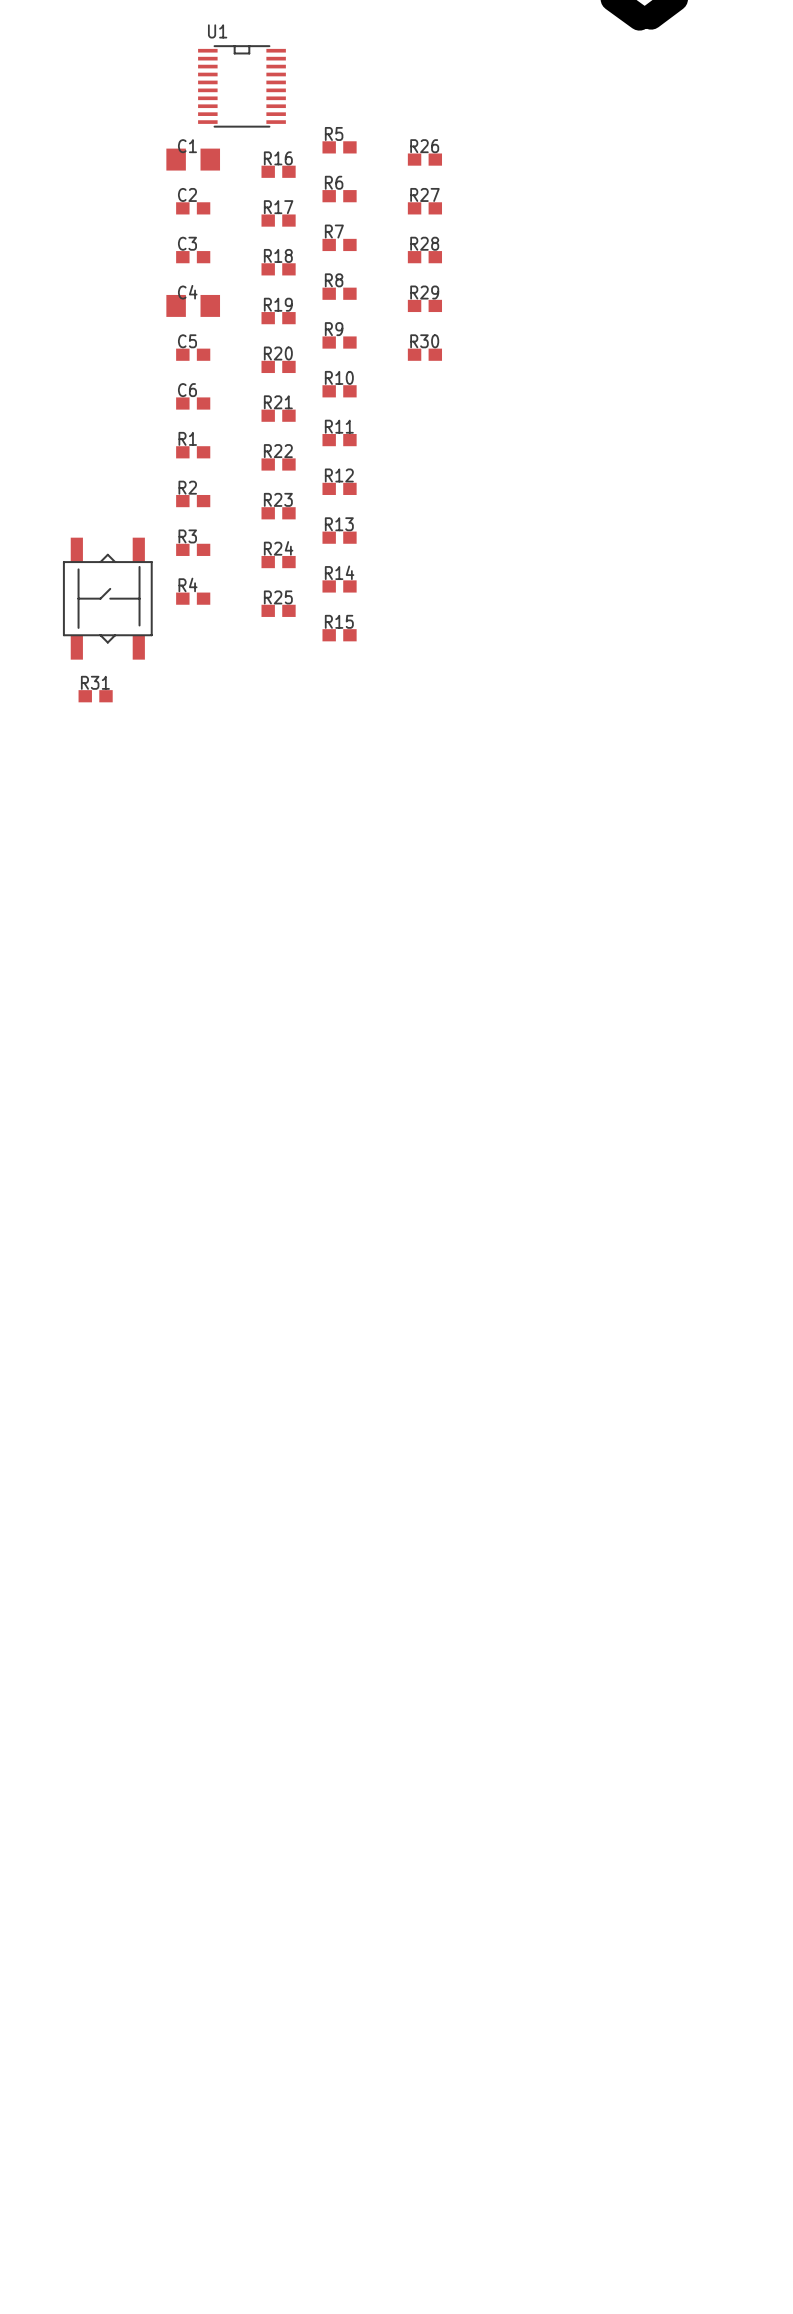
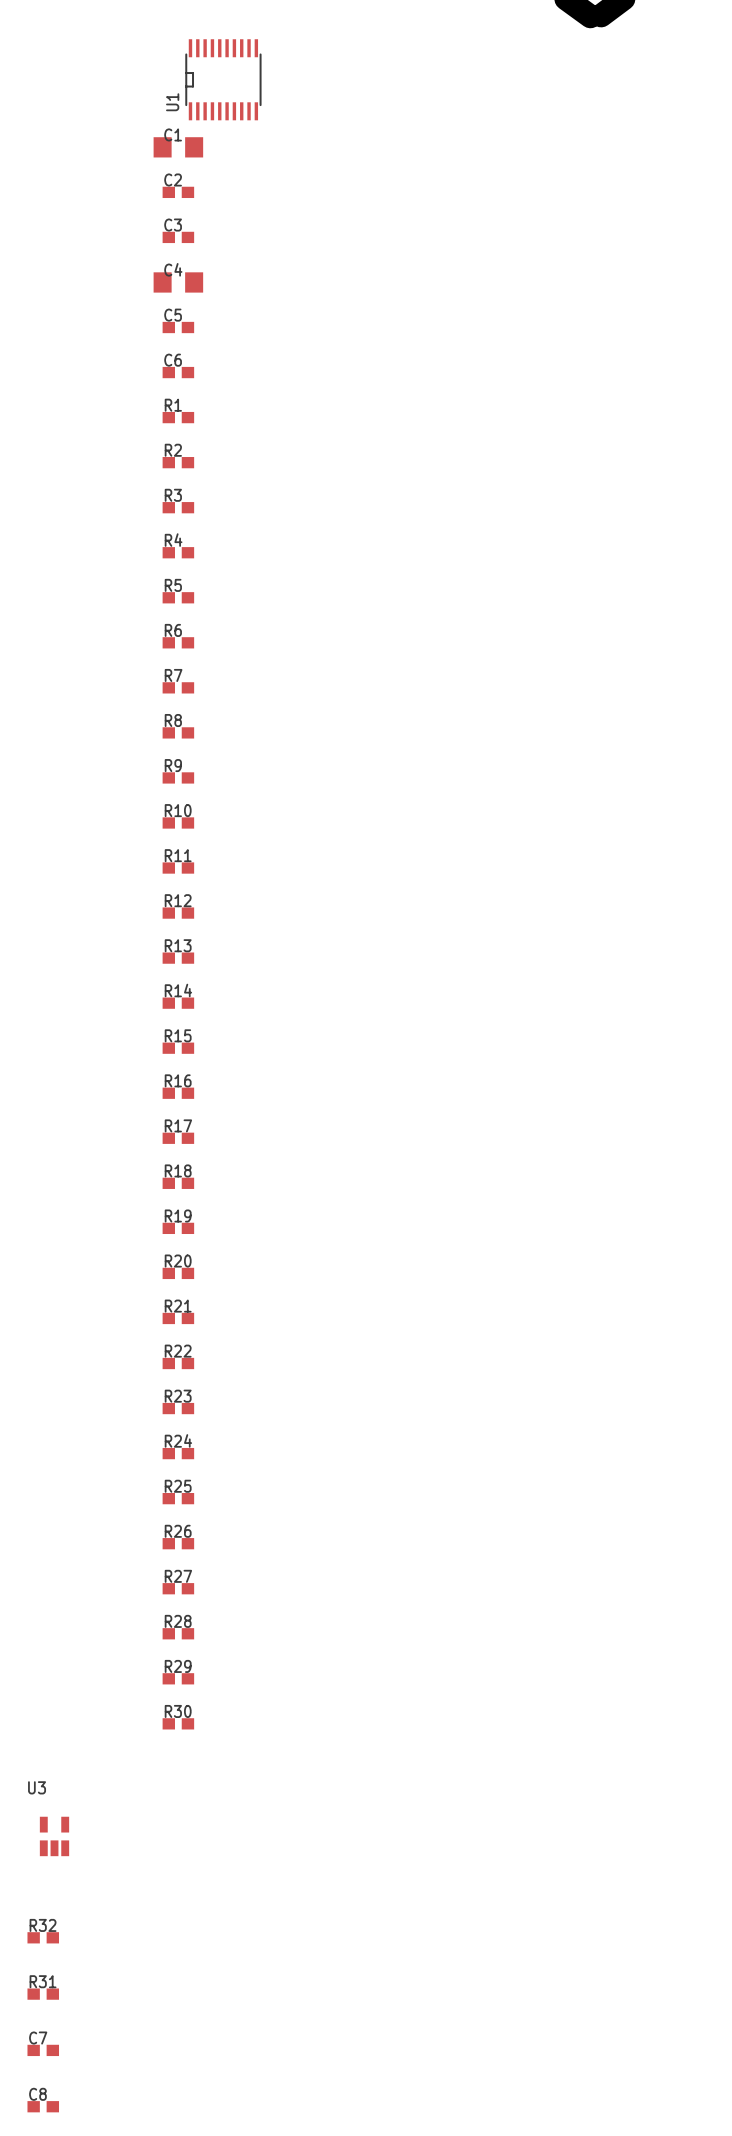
U1 rotation: 0° (241, 86) -> 90° counterclockwise (223, 79)
R5 position: (339, 147) -> (178, 597)
R26 position: (424, 159) -> (178, 1543)
R16 position: (278, 171) -> (178, 1093)
R6 position: (339, 196) -> (178, 642)
R27 position: (424, 208) -> (178, 1588)
R17 position: (278, 220) -> (178, 1138)
R7 position: (339, 244) -> (178, 687)
R28 position: (424, 257) -> (178, 1633)
R18 position: (278, 269) -> (178, 1183)
R8 position: (339, 293) -> (178, 732)
R29 position: (424, 305) -> (178, 1678)
R19 position: (278, 318) -> (178, 1228)
R9 position: (339, 342) -> (178, 777)
R30 position: (424, 354) -> (178, 1723)
R20 position: (278, 366) -> (178, 1273)
R10 position: (339, 391) -> (178, 822)
R21 position: (278, 415) -> (178, 1318)
R11 position: (339, 440) -> (178, 868)
R22 position: (278, 464) -> (178, 1363)
R12 position: (339, 488) -> (178, 913)
R23 position: (278, 513) -> (178, 1408)
R13 position: (339, 537) -> (178, 958)
R24 position: (278, 562) -> (178, 1453)
R14 position: (339, 586) -> (178, 1003)
part: (107, 598) -> none
R25 position: (278, 610) -> (178, 1498)
R15 position: (339, 635) -> (178, 1048)
R31 position: (95, 696) -> (43, 1994)
U3: none -> (54, 1836)
R32: none -> (43, 1937)
C7: none -> (43, 2050)
C8: none -> (43, 2106)

